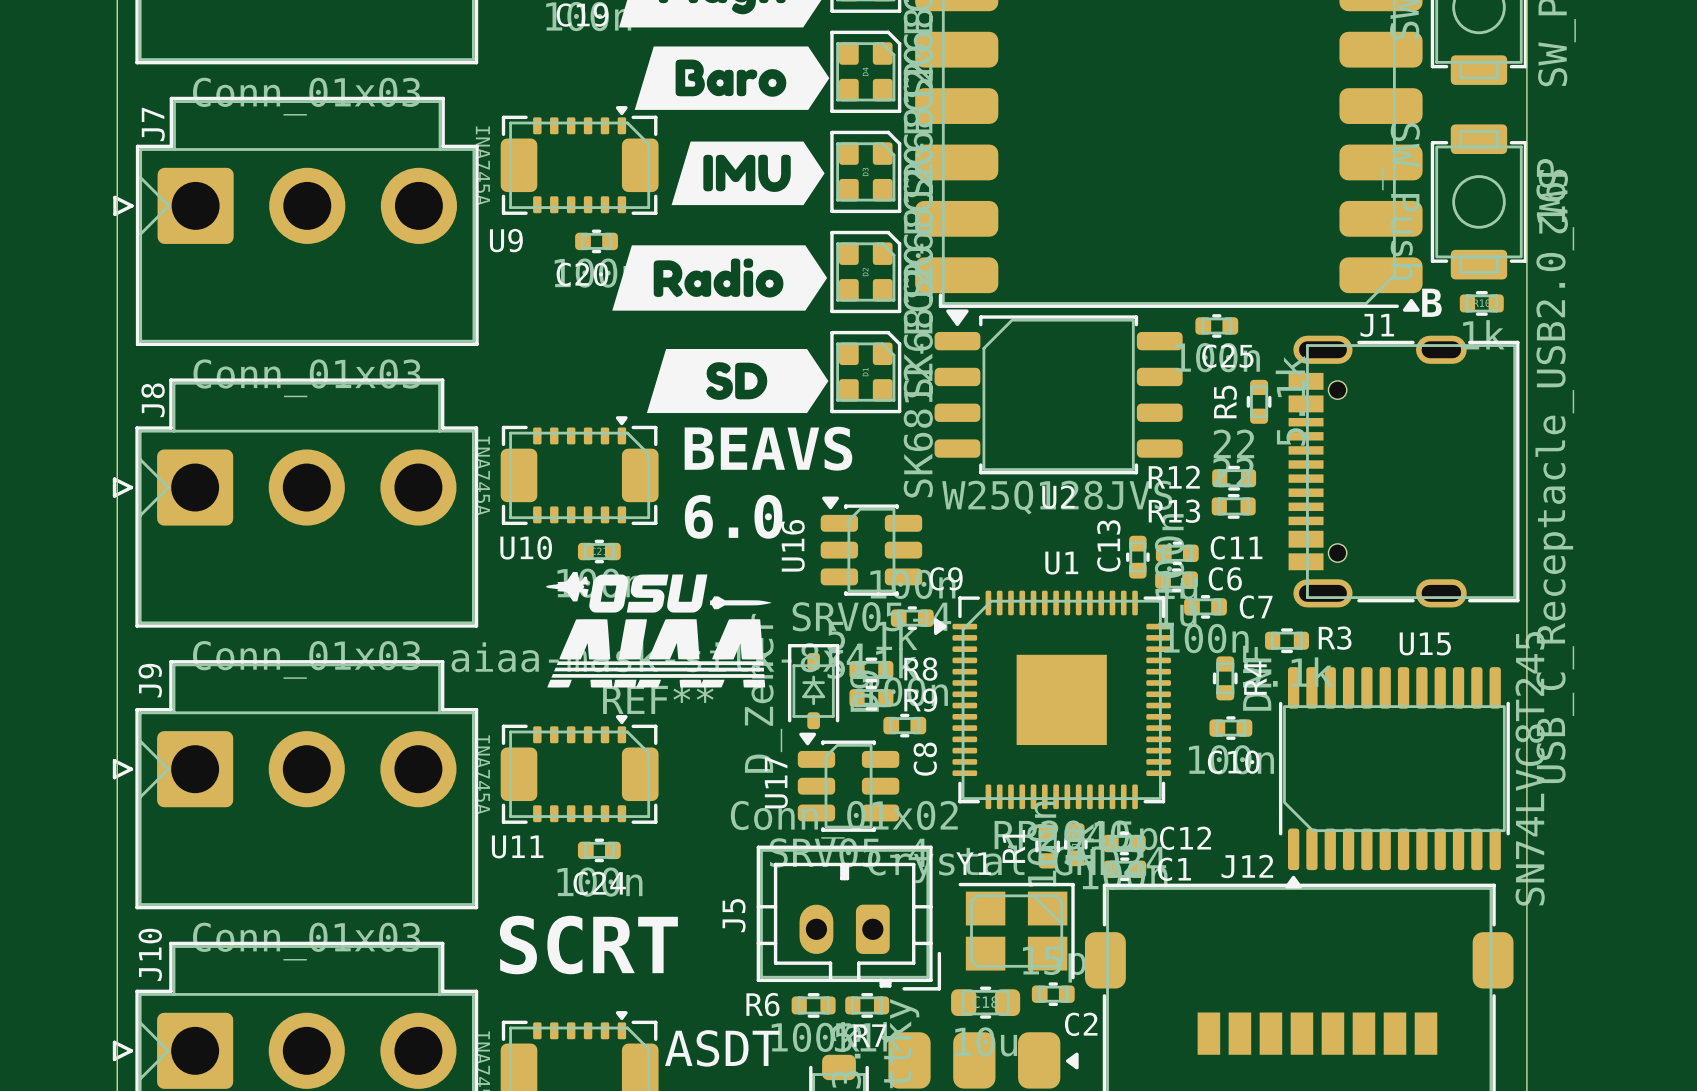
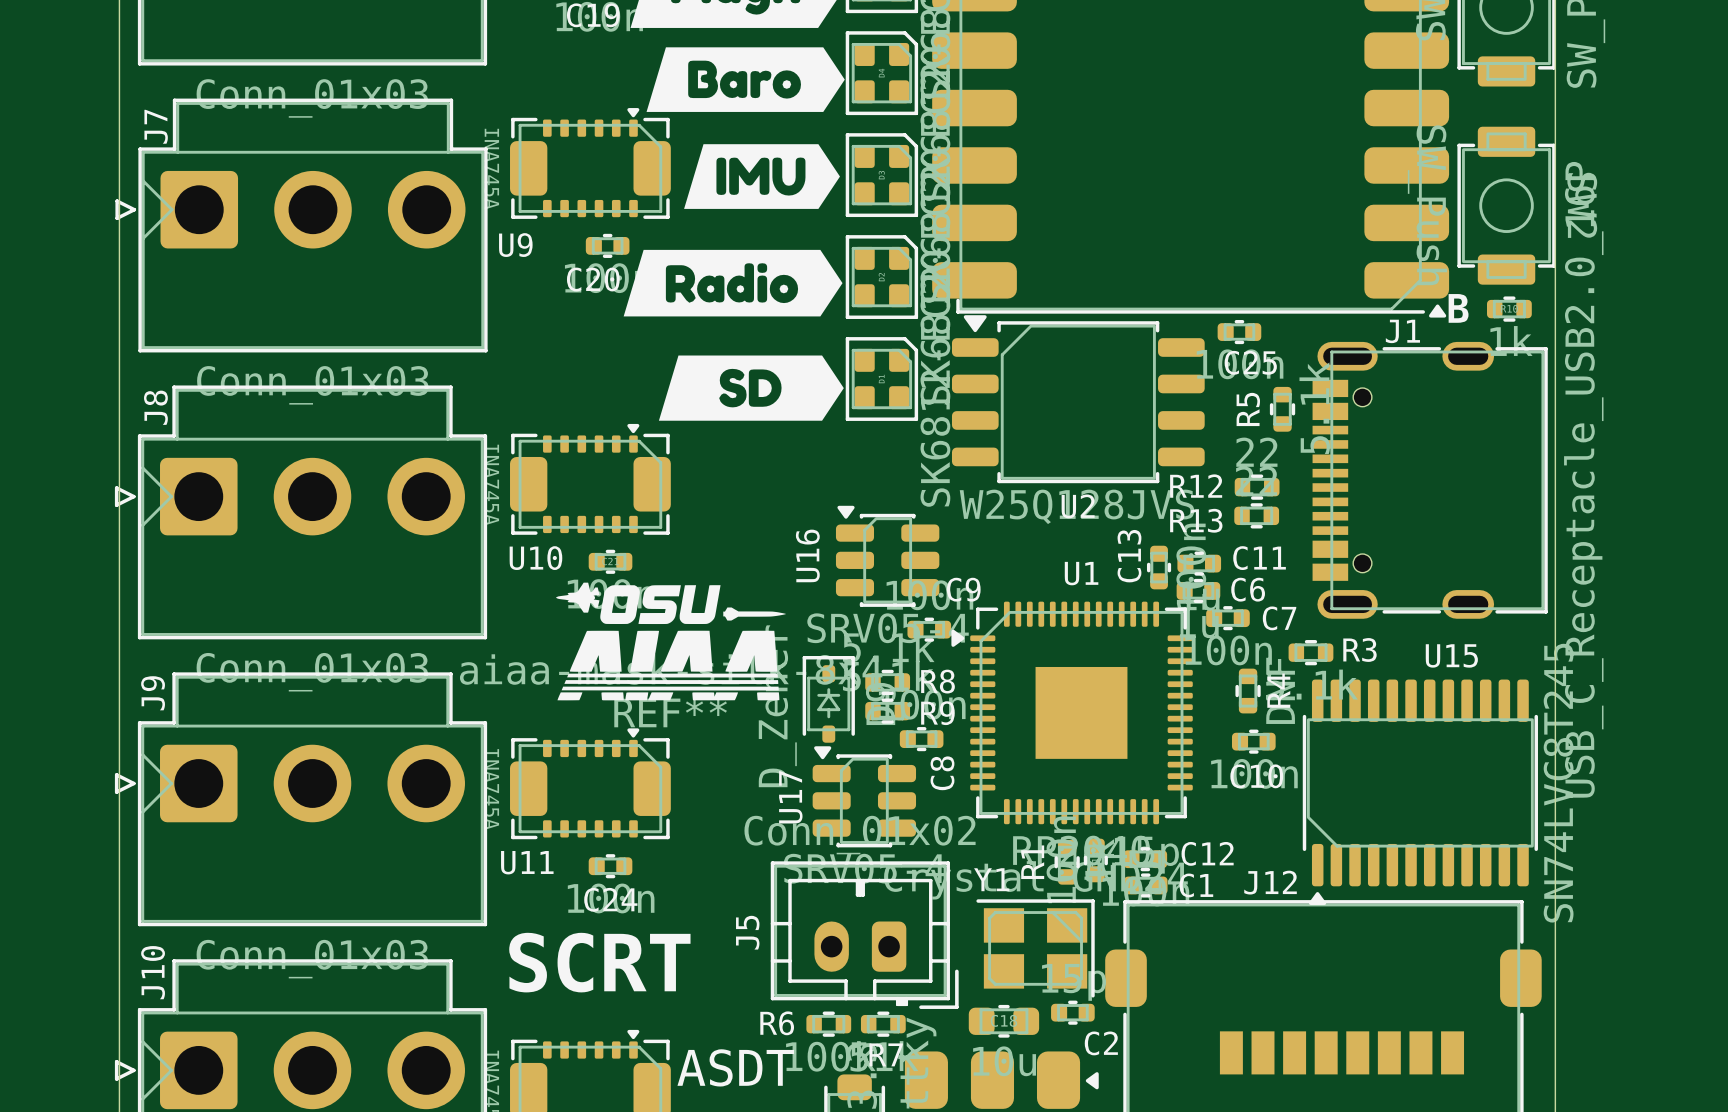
text: BEAVS (768, 448) -> none
text: 6.0 (733, 516) -> none

